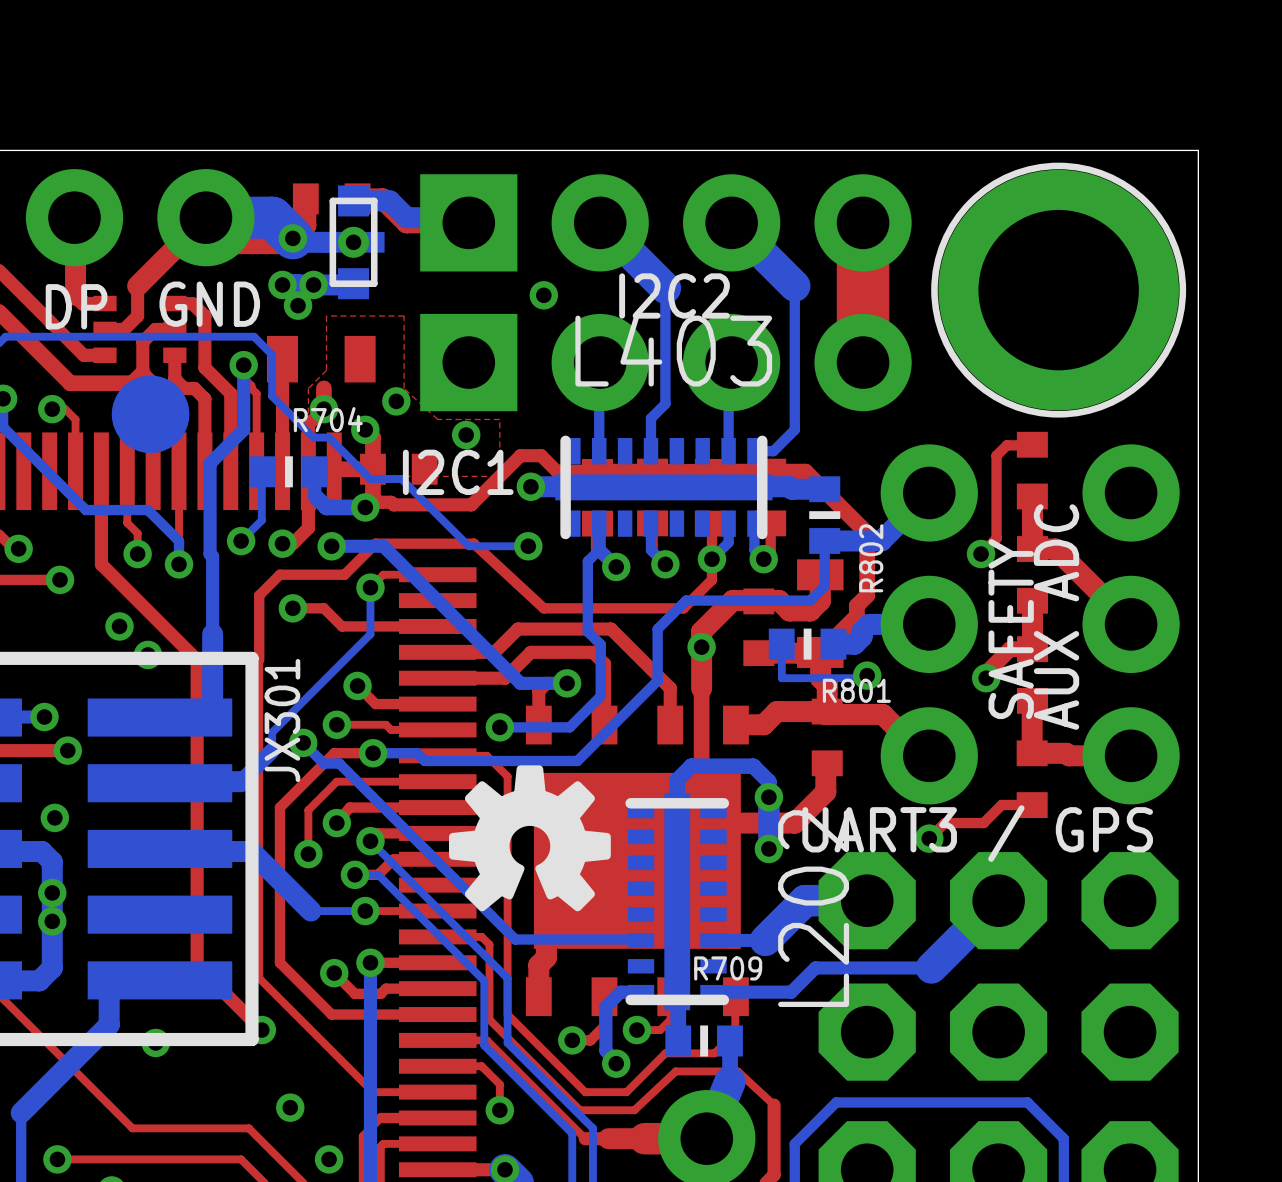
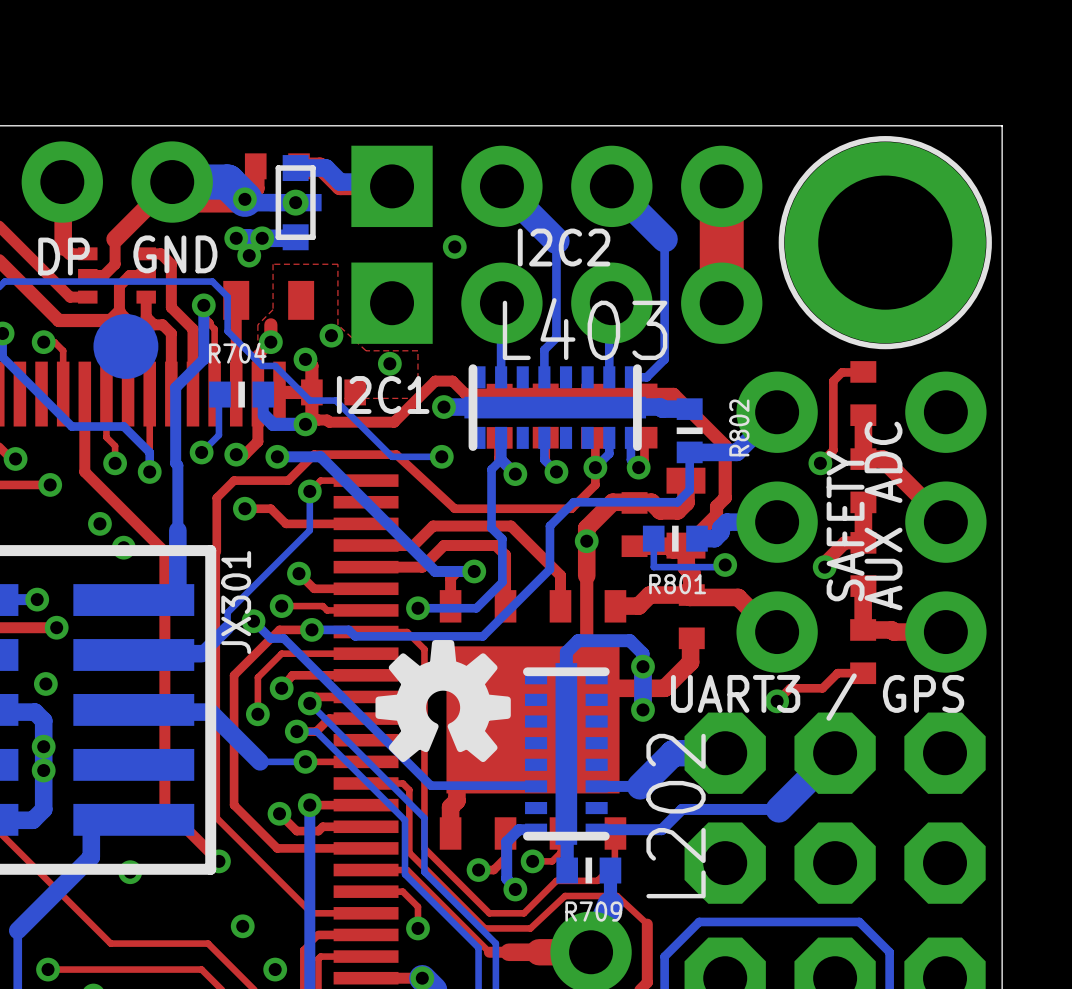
L403 name position: L403 (673, 349) -> L403 (585, 329)
R704 name position: R704 (328, 419) -> R704 (237, 353)
R802 name position: R802 (871, 558) -> R802 (739, 427)
R801 name position: R801 (856, 690) -> R801 (677, 584)
L202 name position: L202 (813, 908) -> L202 (676, 816)
R709 name position: R709 (728, 968) -> R709 (593, 911)

